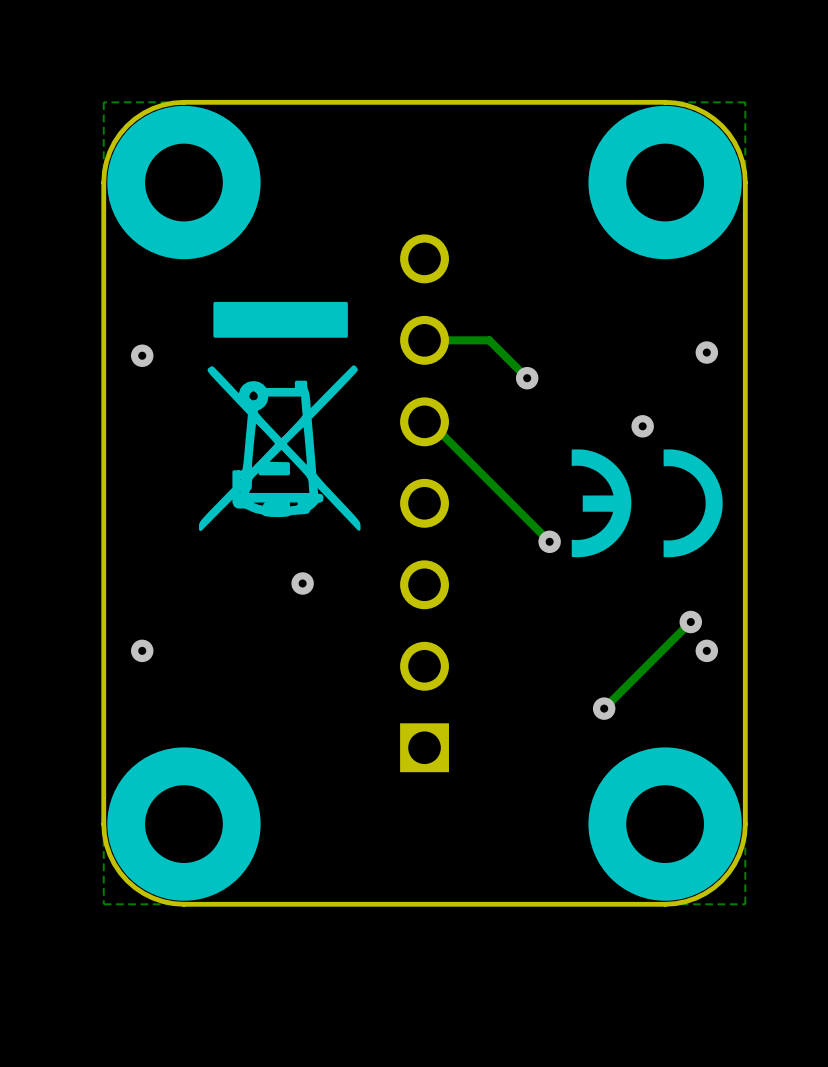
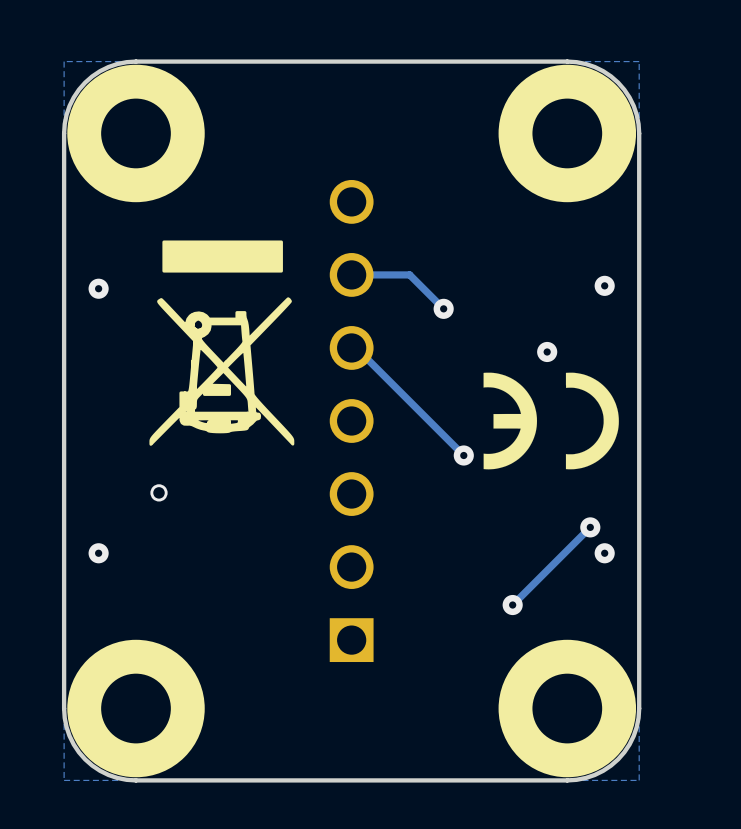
via: none -> (159, 492)
via: (302, 583) -> none

